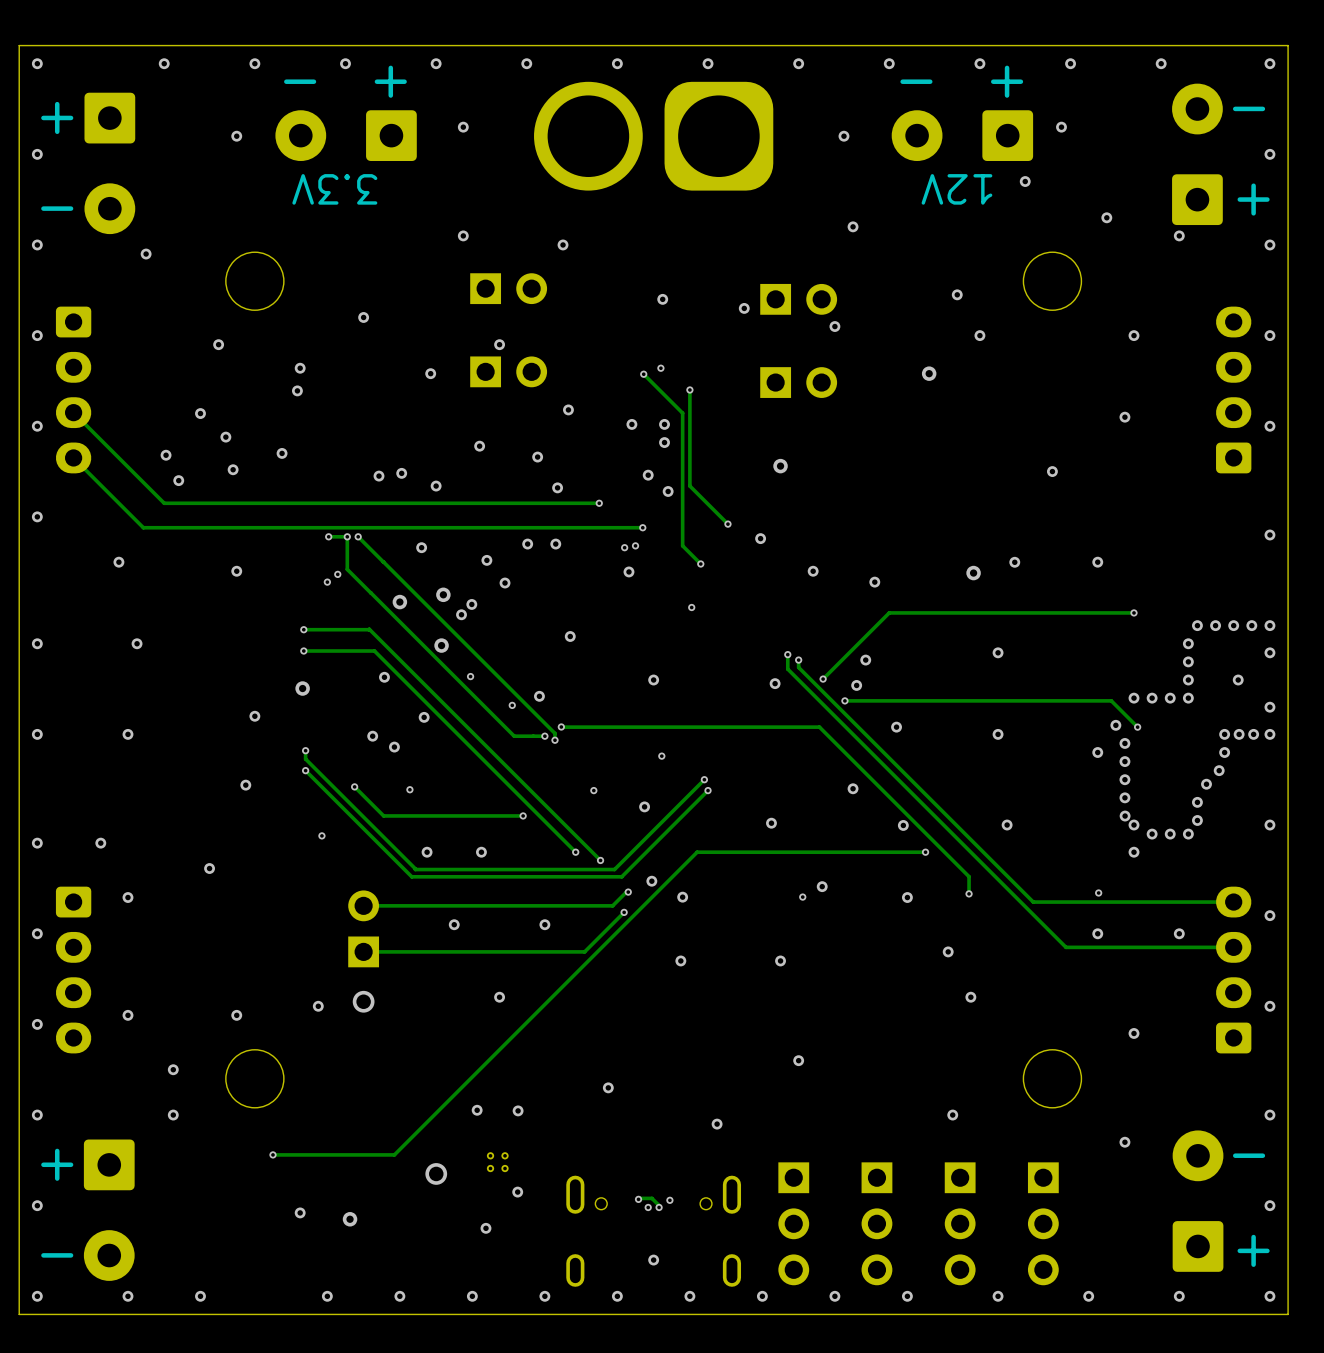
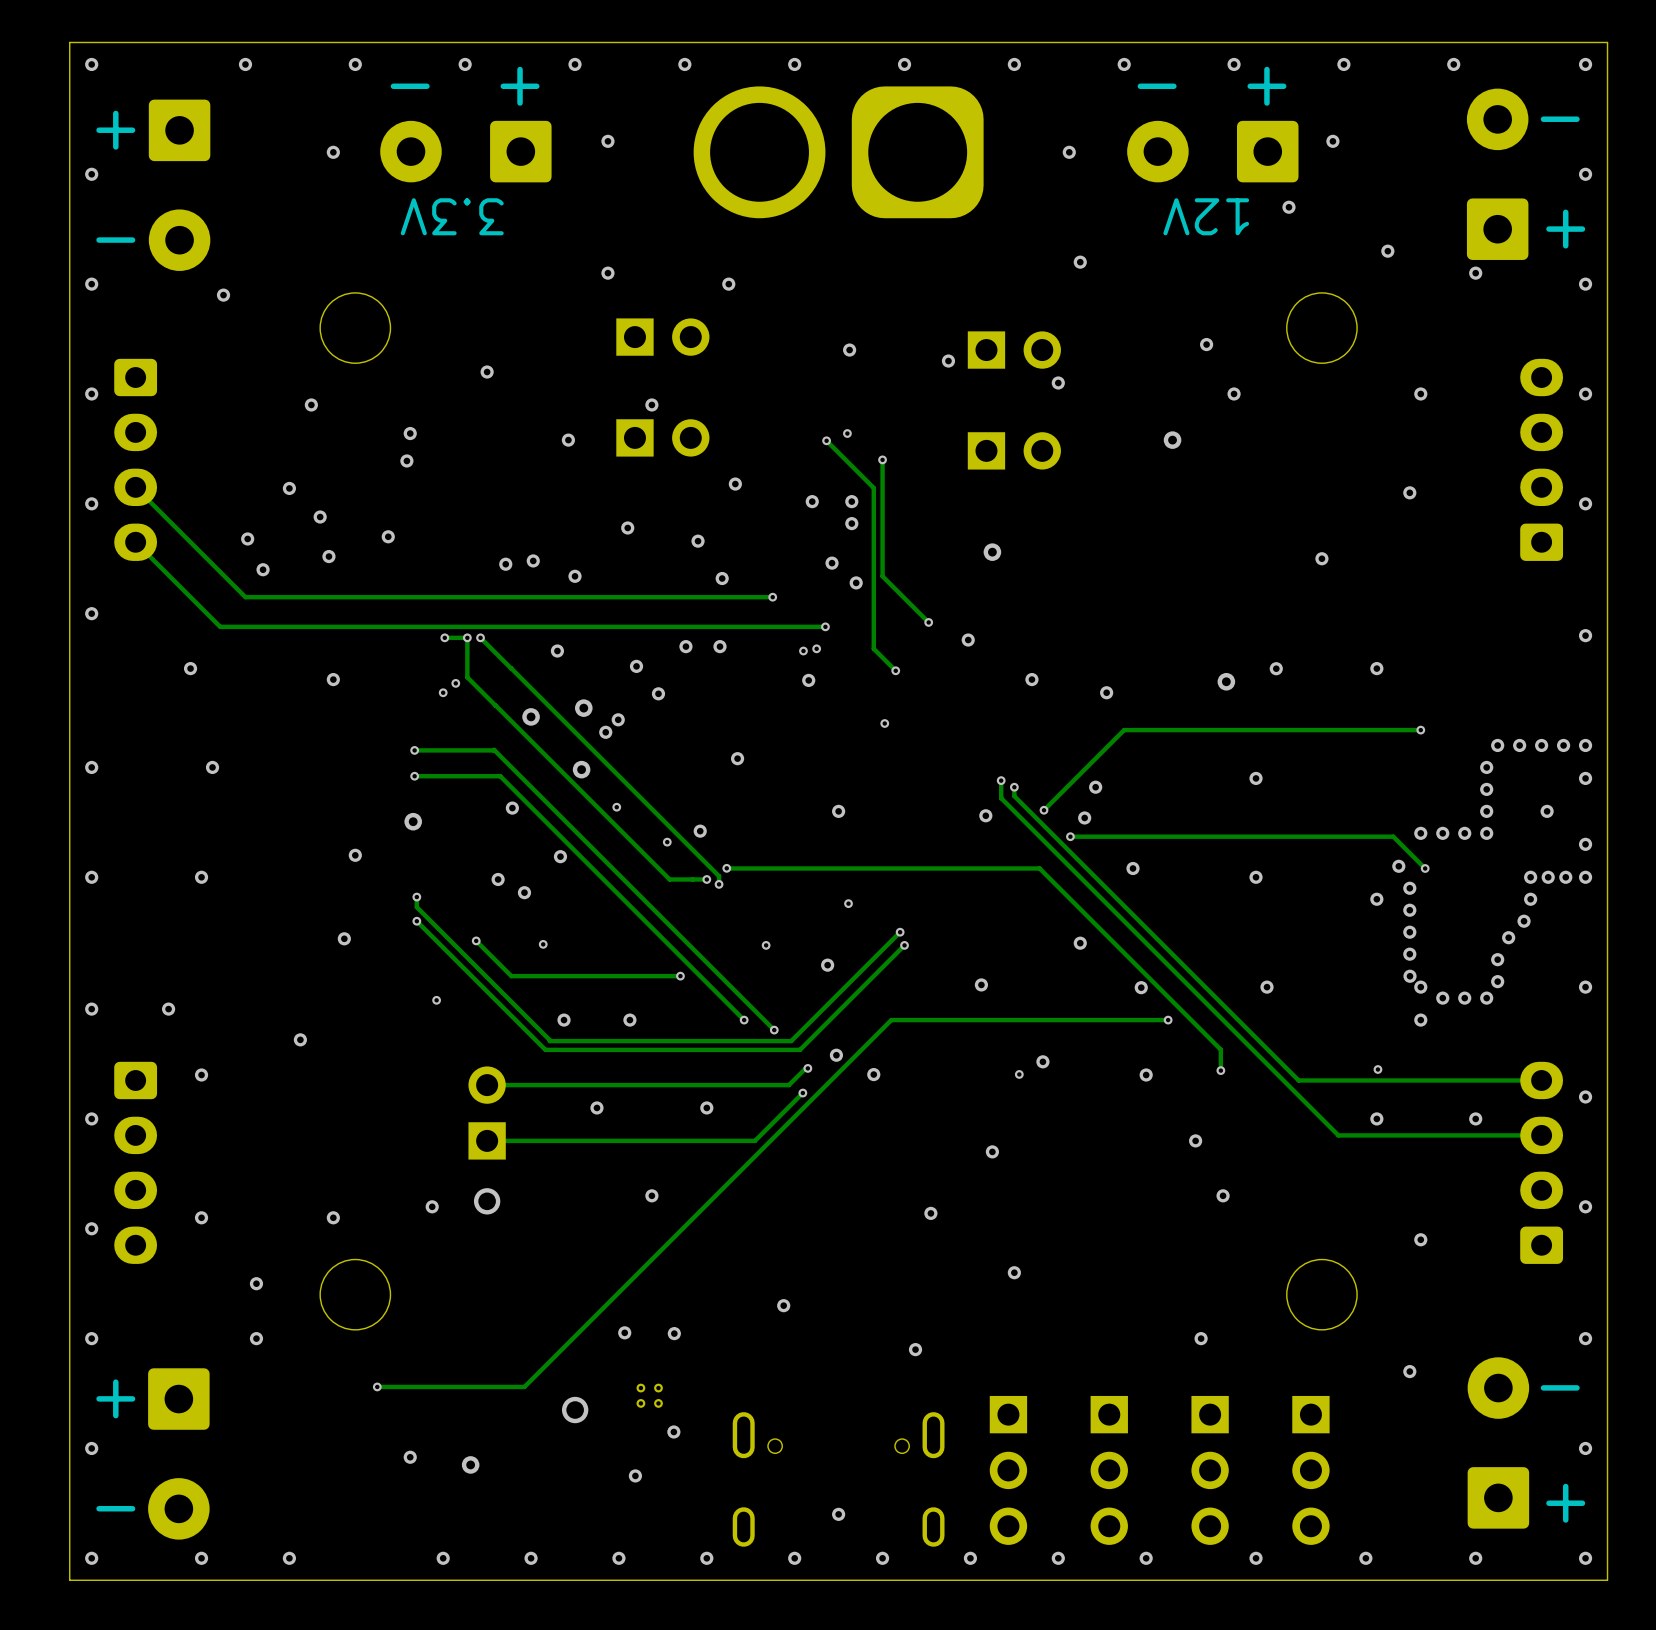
via position: (680, 960) -> (930, 1213)
track: (638, 1199) (651, 1198) (659, 1207) -> none
via: (638, 1199) -> none
via: (669, 1200) -> none
via: (648, 1207) -> none
via: (659, 1207) -> none

